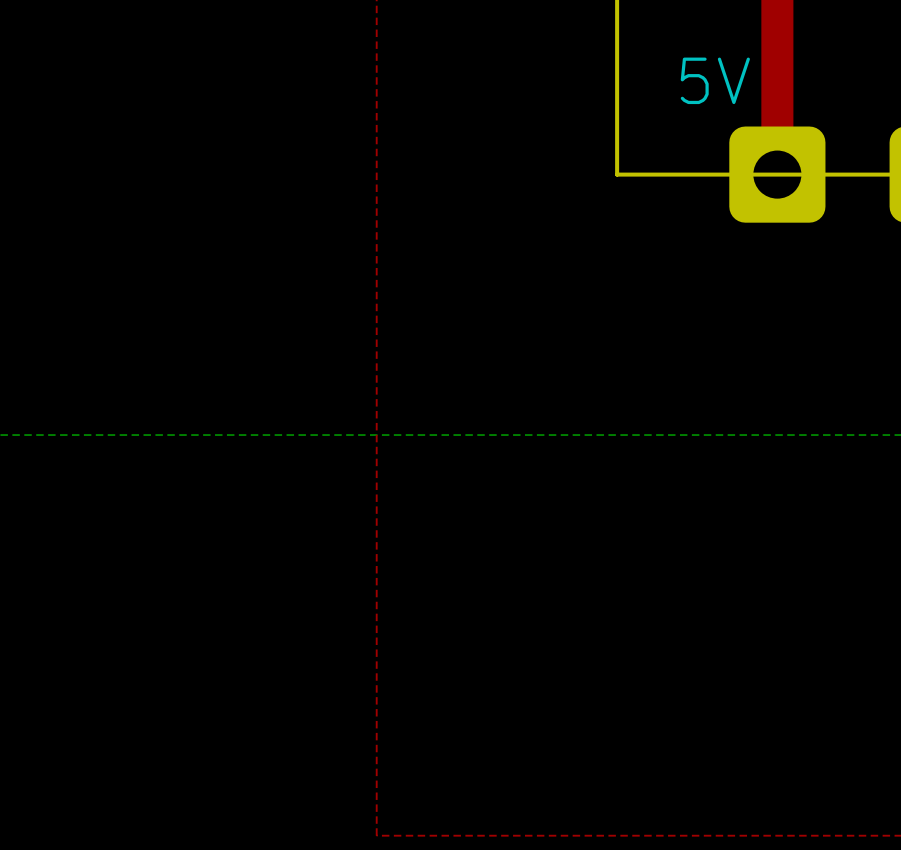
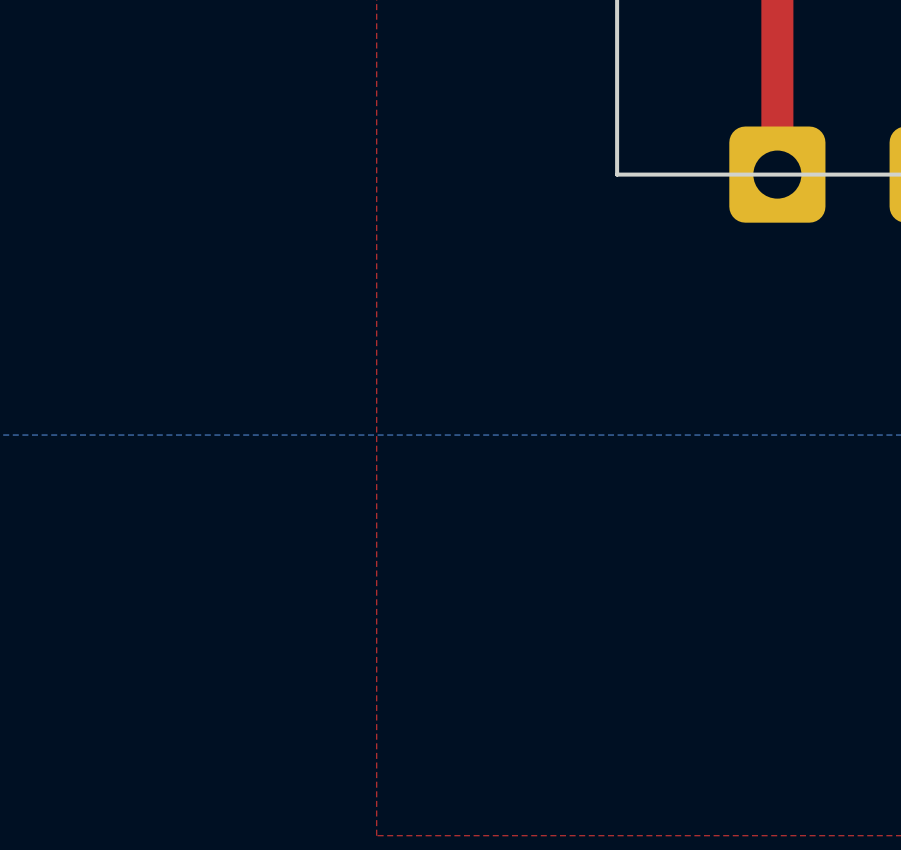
text: 5V (715, 80) -> none

